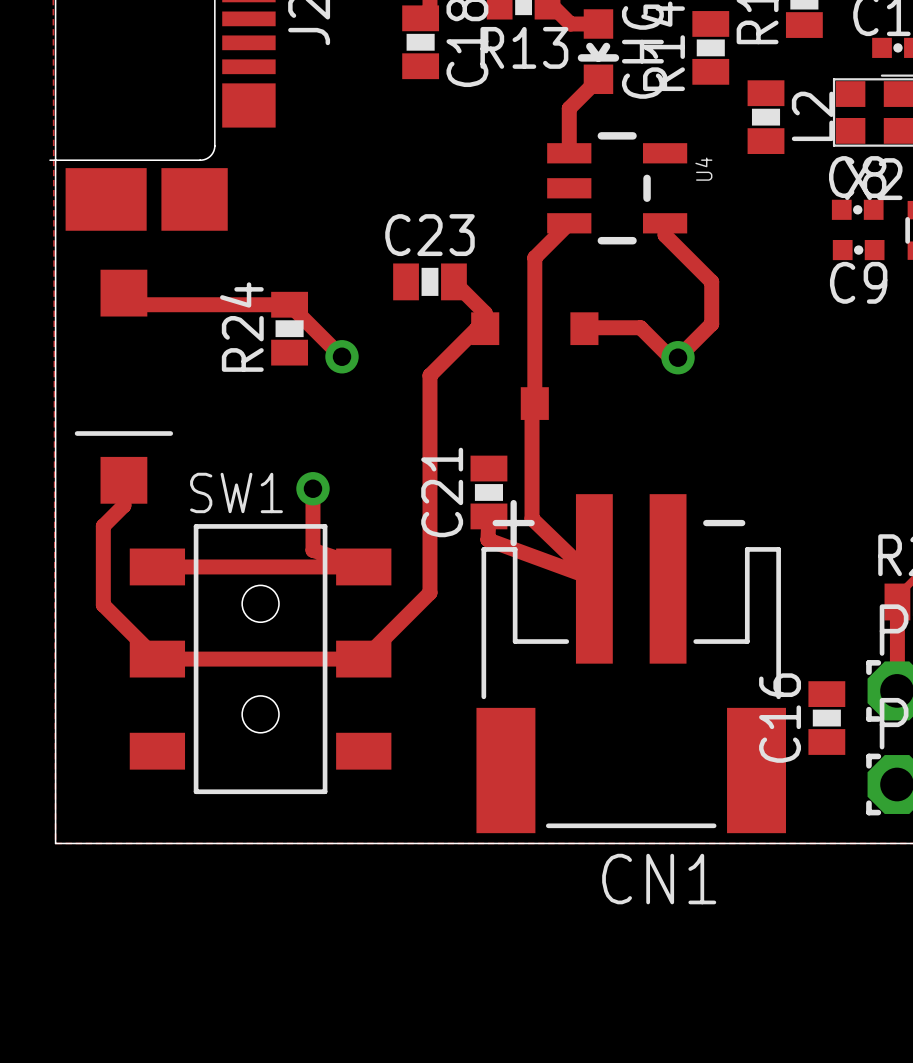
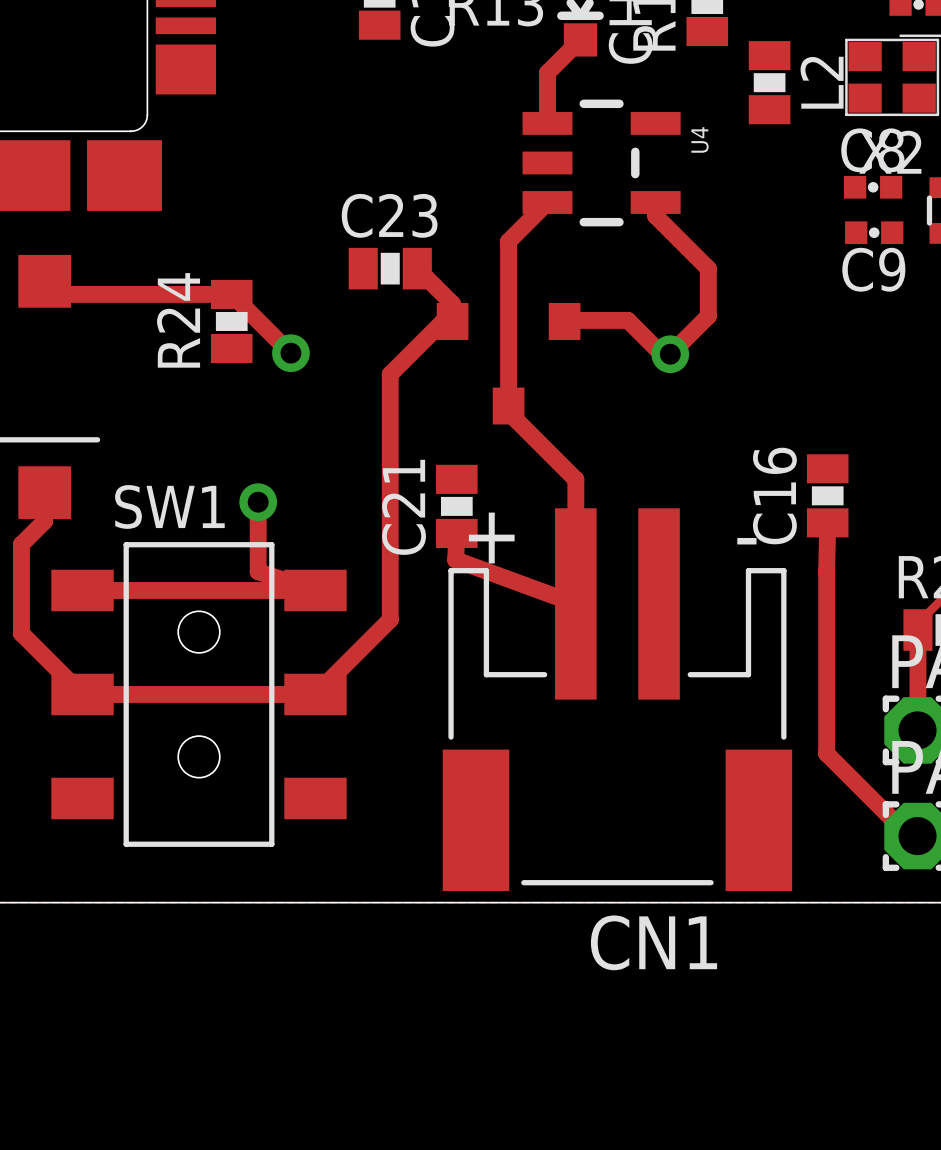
track: (532, 406) (532, 518) (594, 578) -> (505, 409) (575, 479) (575, 603)
track: none -> (827, 522) (826, 753) (909, 836) (917, 836)
C16 position: (826, 718) -> (827, 495)

